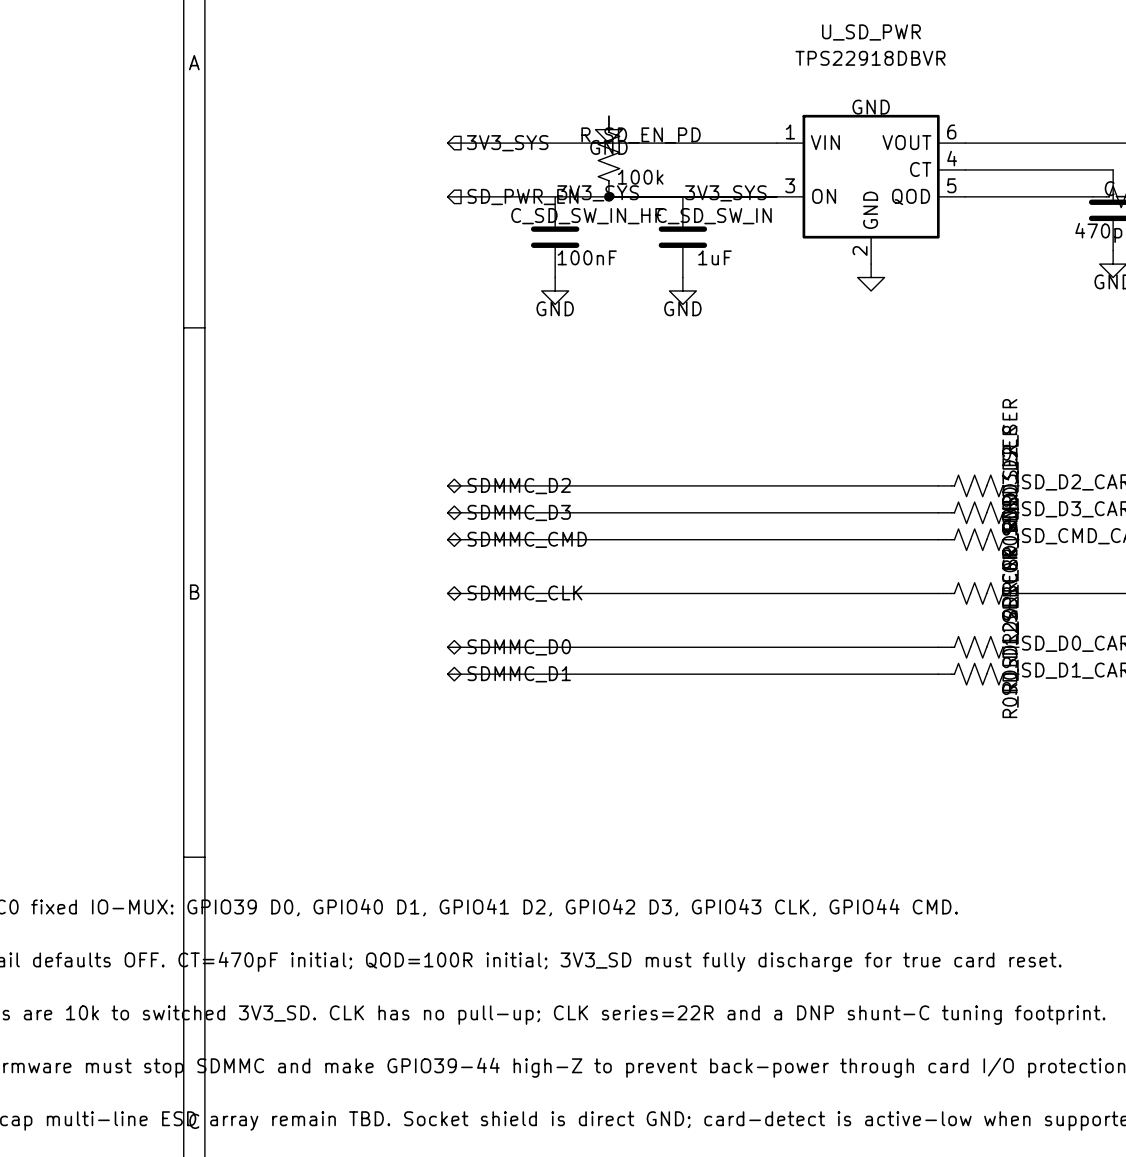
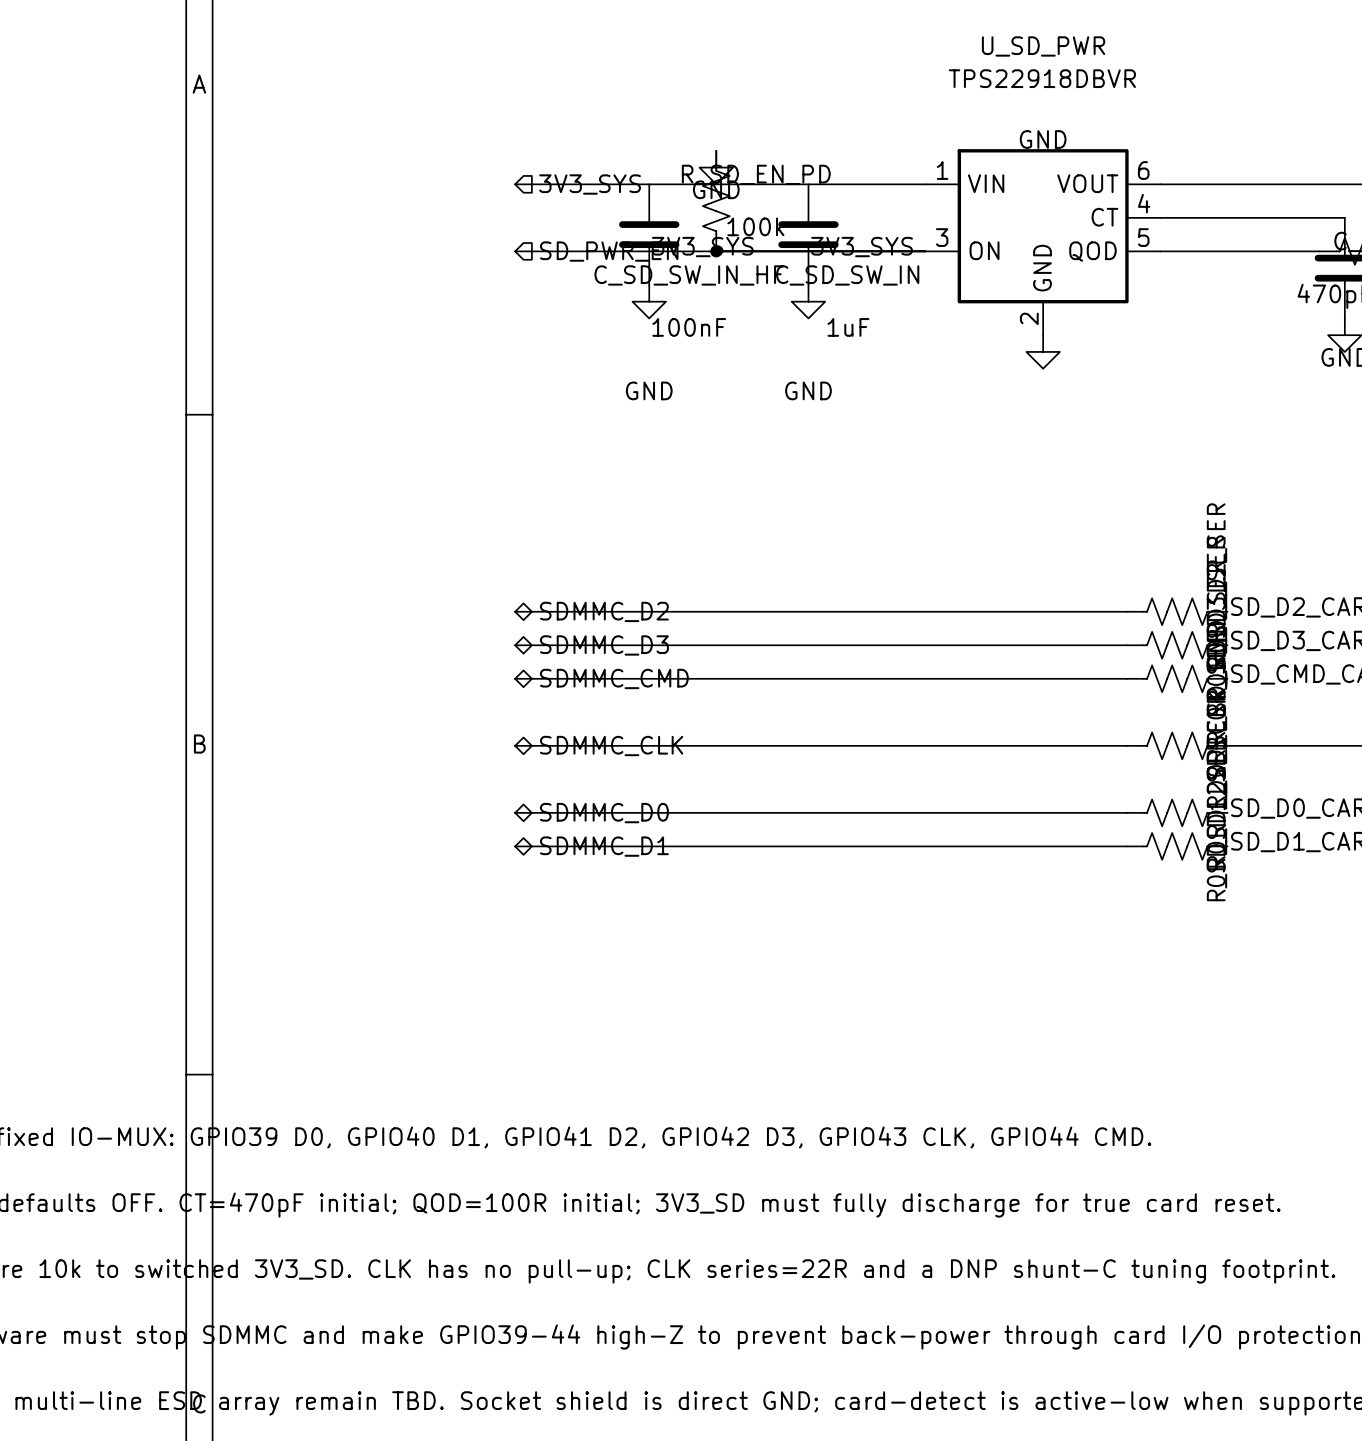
C_SD_SW_IN_HF position: (555, 237) -> (649, 234)
C_SD_SW_IN position: (682, 237) -> (808, 234)
power symbol position: GND (555, 290) -> GND (649, 301)
power symbol position: GND (682, 290) -> GND (808, 301)

